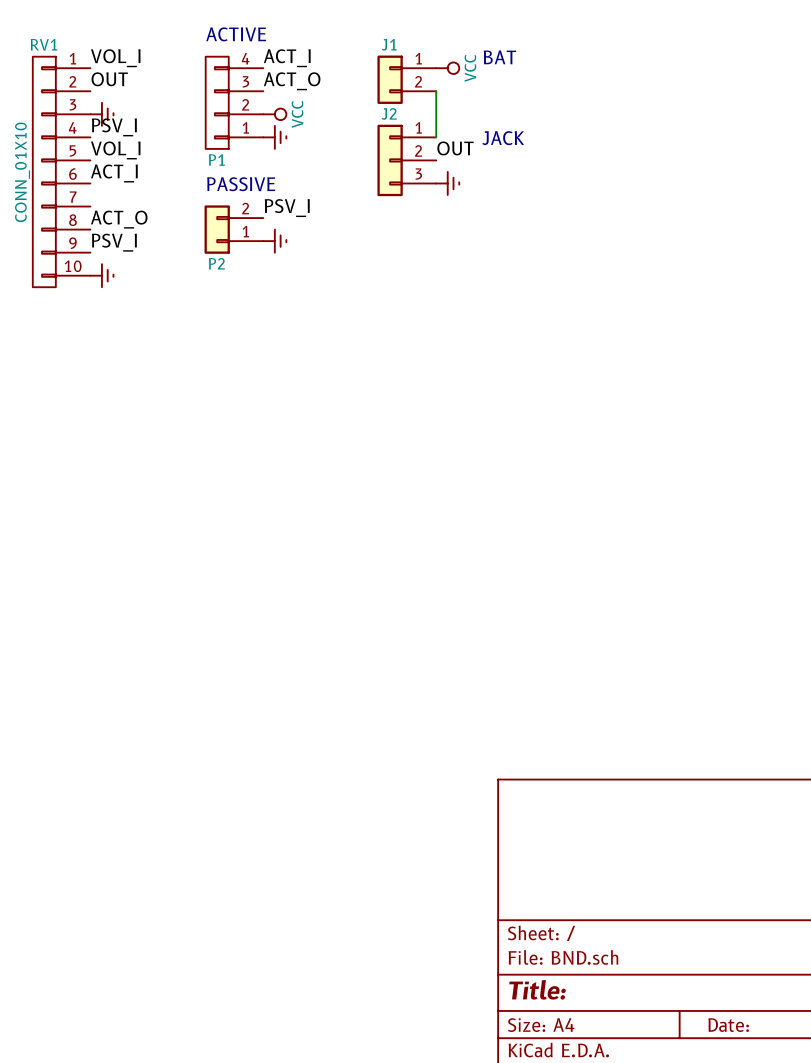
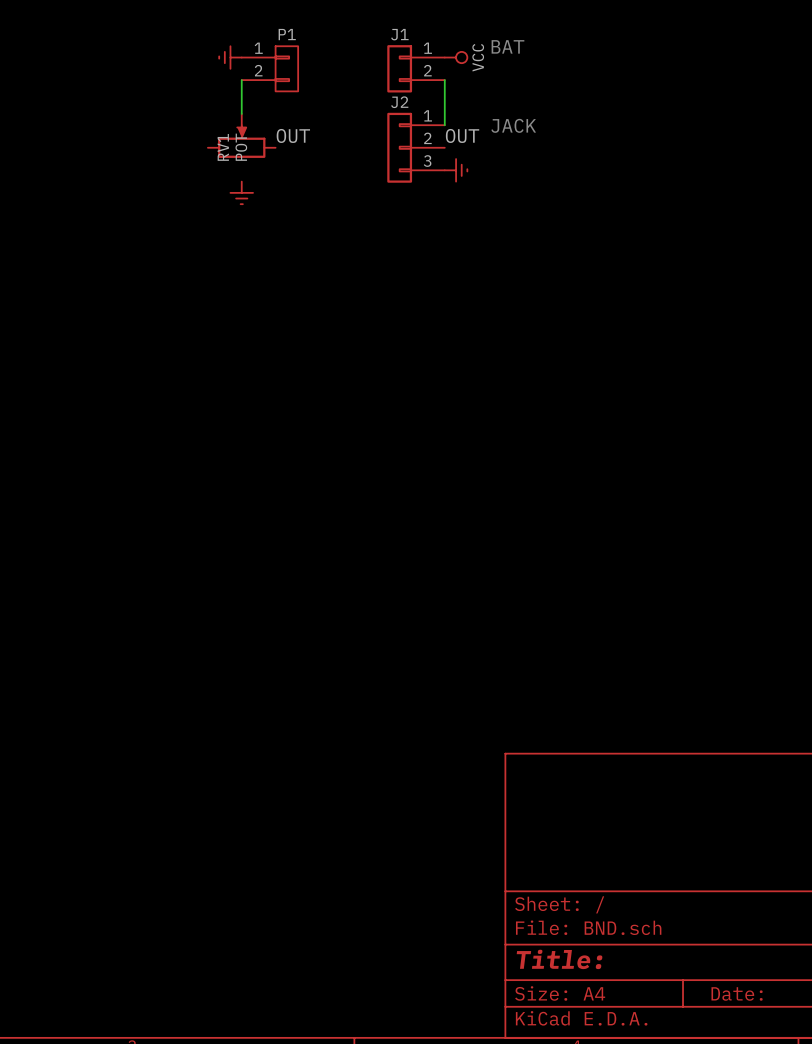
text: ACTIVE (236, 34) -> none
RV1 name position: RV1 (43, 44) -> RV1 (223, 147)
RV1 symbol: [32, 56, 91, 288] -> [207, 113, 276, 158]
P1 symbol: [205, 56, 264, 149] -> [241, 46, 299, 92]
label: VOL_I (115, 58) -> none
label: ACT_I (287, 58) -> none
power symbol: none -> (230, 57)
label position: OUT (109, 79) -> OUT (293, 135)
label: ACT_O (292, 81) -> none
power symbol: (101, 114) -> none
power symbol: VCC (274, 114) -> none
label: PSV_I (114, 127) -> none
power symbol: (274, 137) -> none
label: VOL_I (115, 150) -> none
P1 name position: P1 (216, 160) -> P1 (287, 34)
RV1 value: CONN_01X10 (22, 172) -> POT (241, 147)
label: ACT_I (114, 173) -> none
text: PASSIVE (241, 184) -> none
power symbol: none -> (241, 192)
label: PSV_I (287, 208) -> none
label: ACT_O (119, 219) -> none
P2: (233, 229) -> none
power symbol: (274, 241) -> none
label: PSV_I (114, 242) -> none
power symbol: (101, 275) -> none

